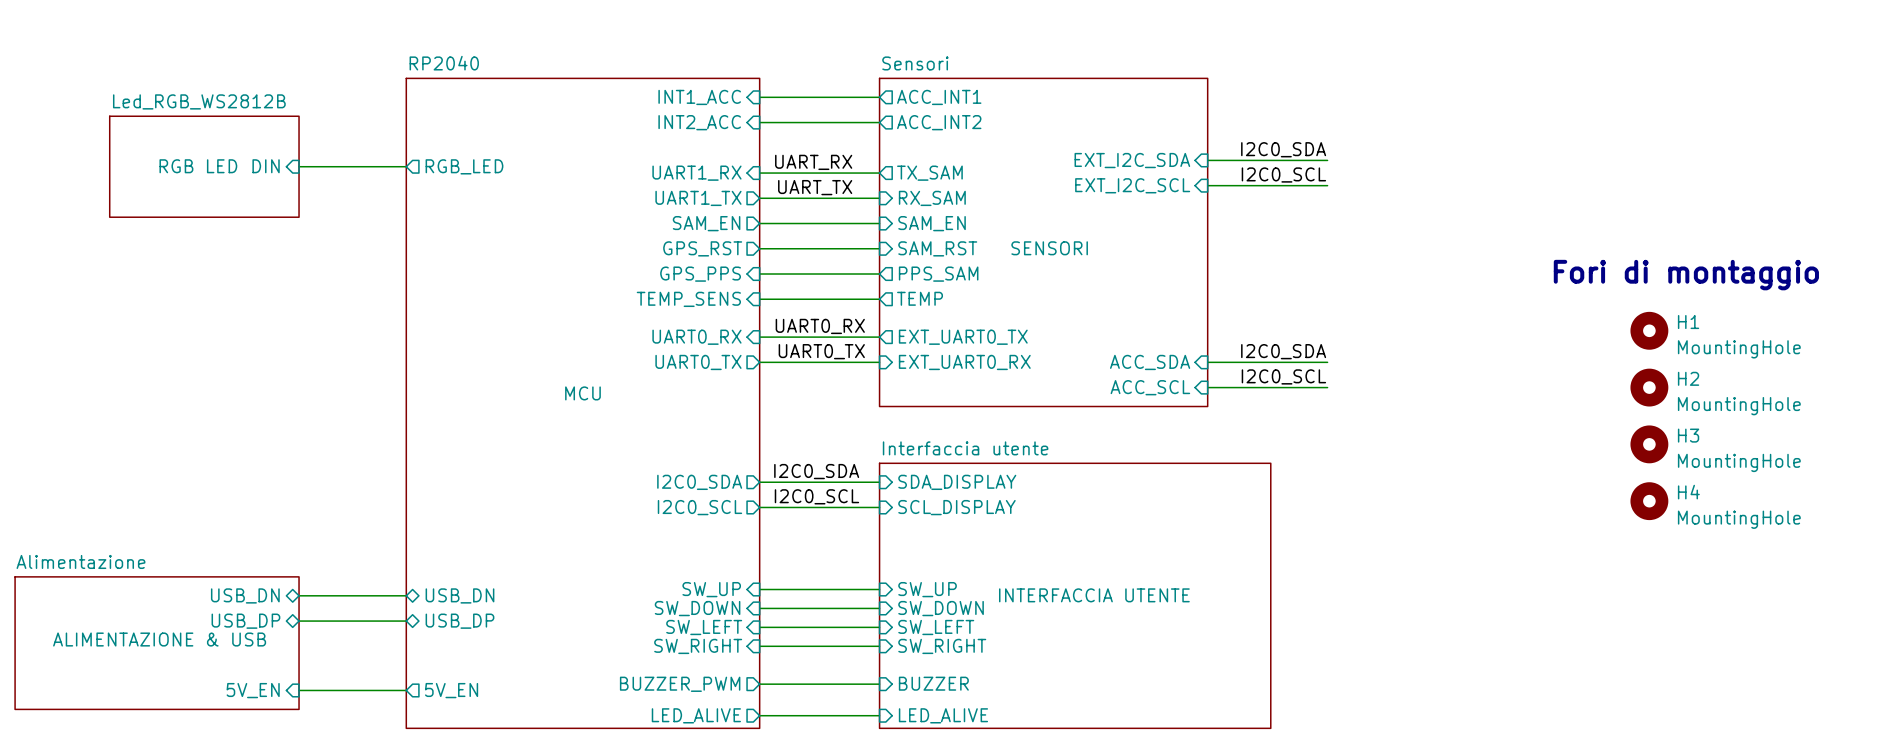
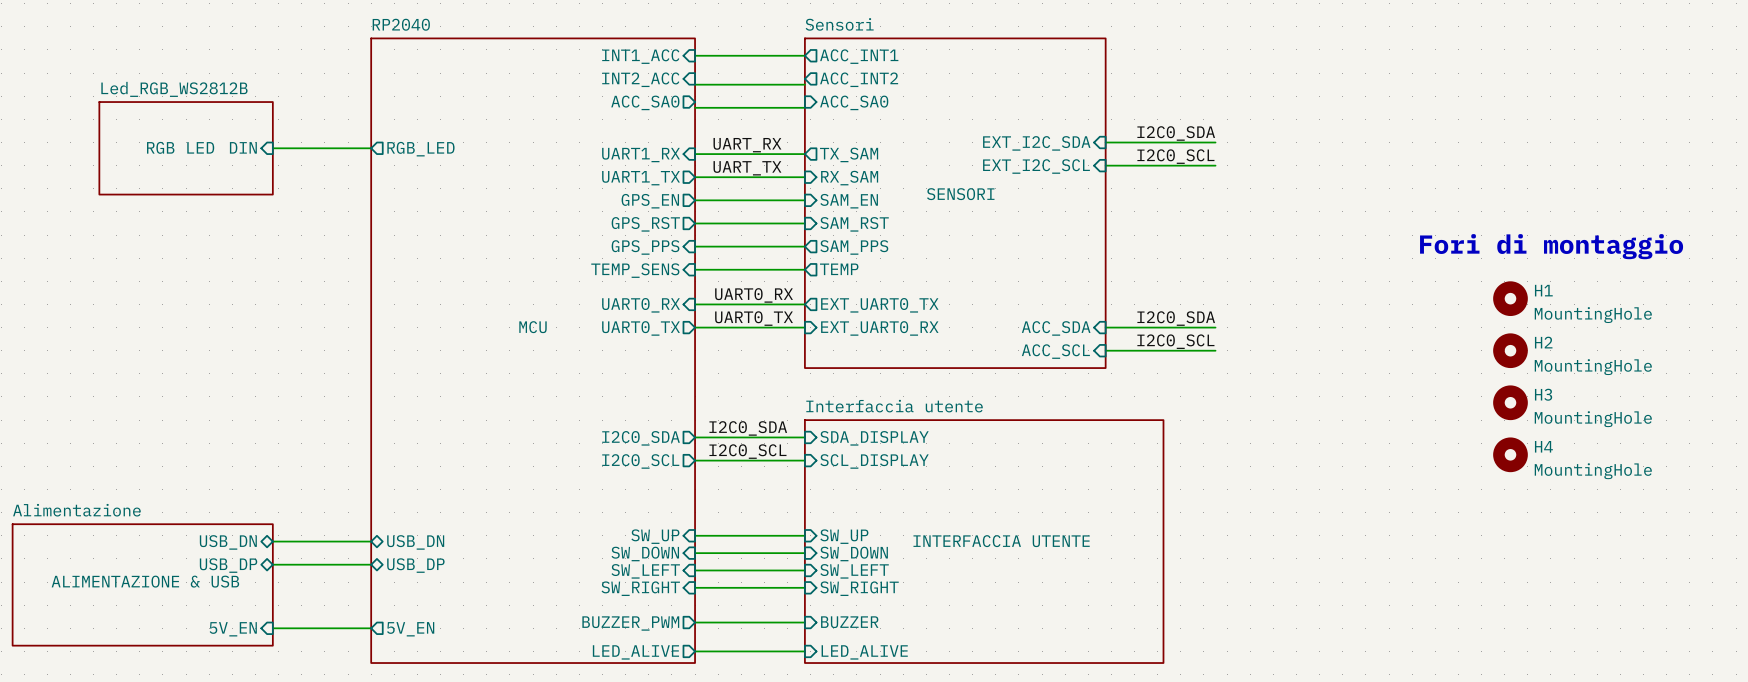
wire: none -> (695, 55) (804, 55)
sheet RP2040 shape: [405, 77, 761, 730] -> [370, 37, 696, 664]
sheet pin position: INT1_ACC (699, 97) -> INT1_ACC (640, 56)
sheet pin position: ACC_INT1 (939, 97) -> ACC_INT1 (859, 56)
sheet pin: none -> ACC_SA0 (645, 102)
sheet pin: none -> ACC_SA0 (854, 102)
sheet pin position: INT2_ACC (699, 122) -> INT2_ACC (640, 79)
sheet pin position: ACC_INT2 (939, 122) -> ACC_INT2 (859, 79)
sheet pin: SAM_EN (706, 223) -> GPS_EN (650, 201)
sheet Sensori: none -> (955, 203)
sheet Sensori: (1043, 242) -> none
sheet pin: PPS_SAM (938, 274) -> SAM_PPS (854, 247)

